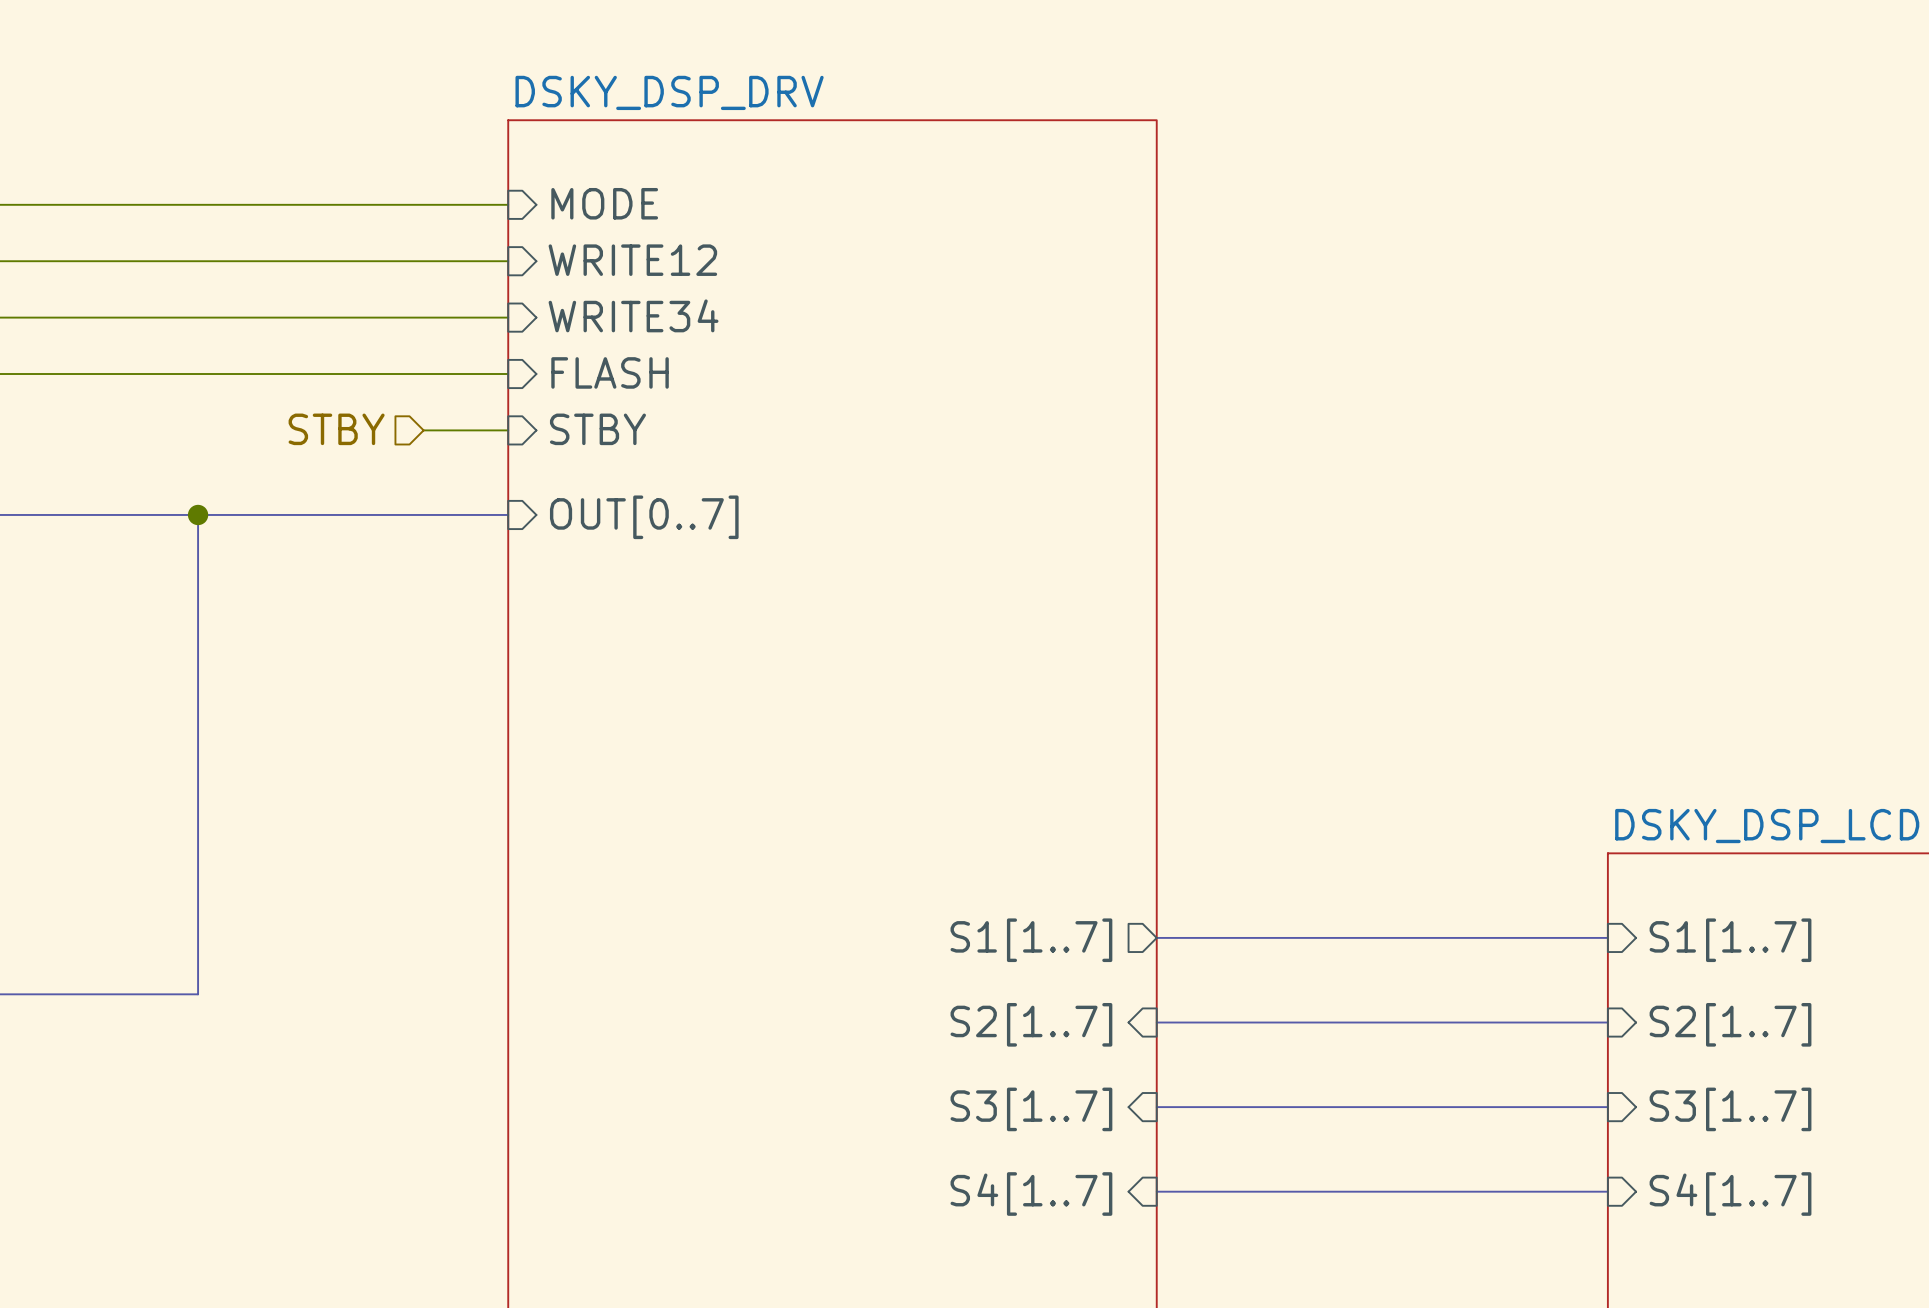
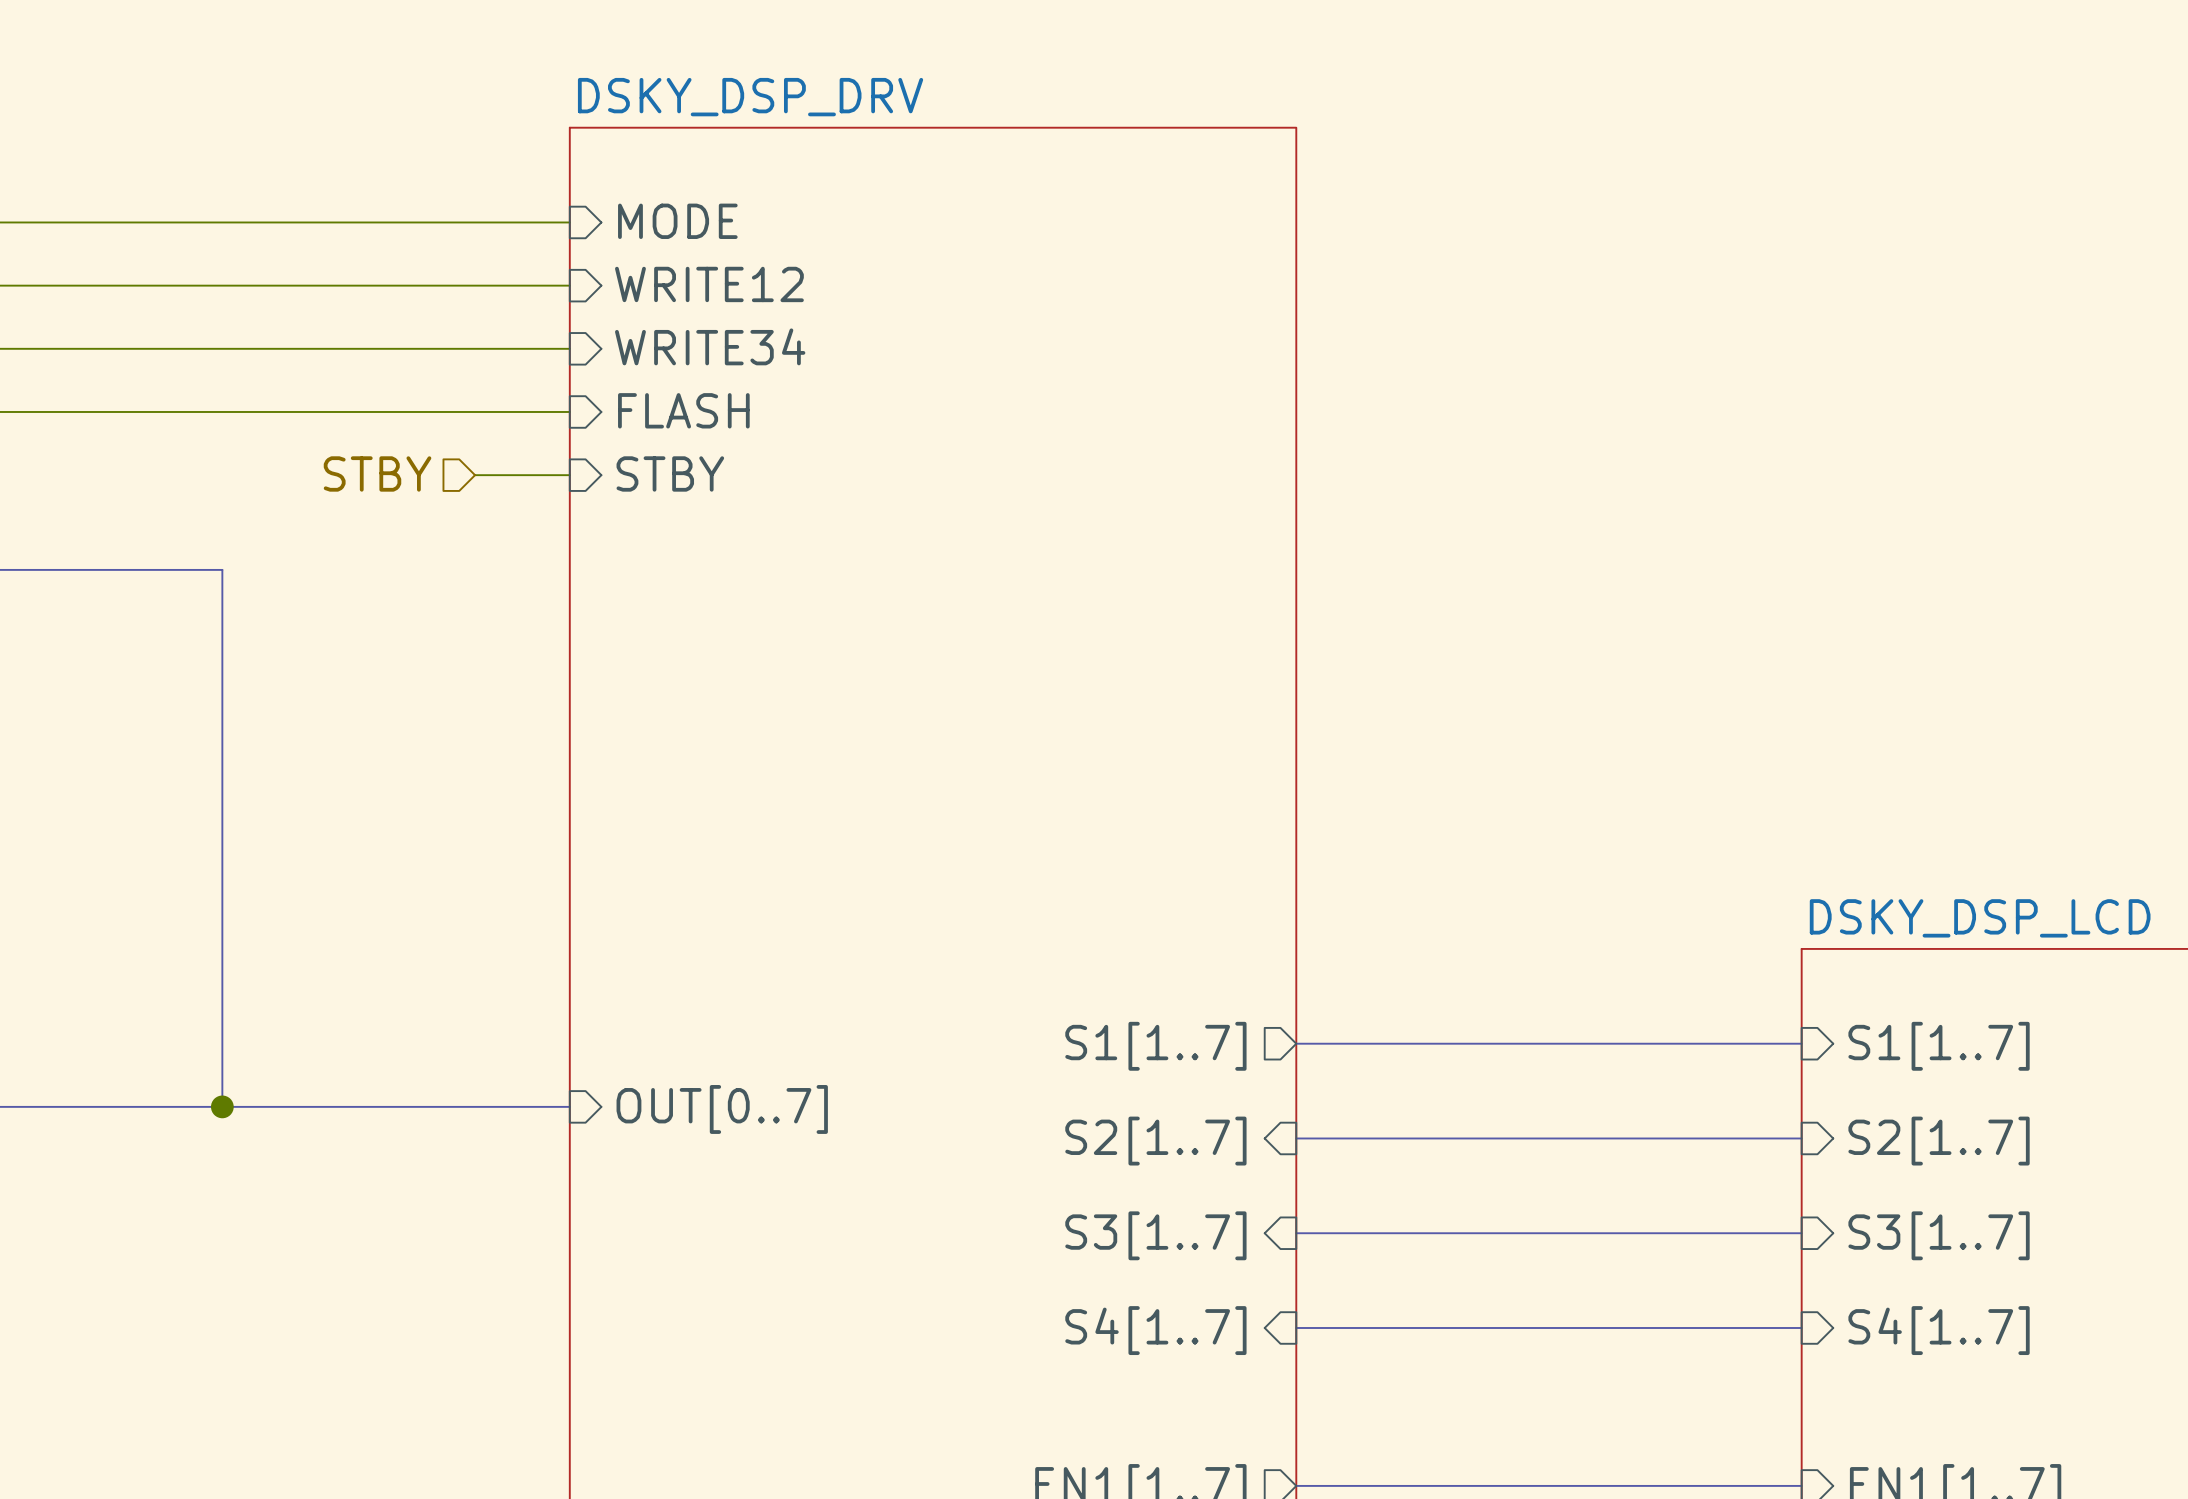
bus: (198, 514) (508, 514) -> (222, 1106) (569, 1106)
junction: (198, 514) -> none
sheet pin position: OUT[0..7] (644, 517) -> OUT[0..7] (722, 1109)
junction: none -> (222, 1106)

